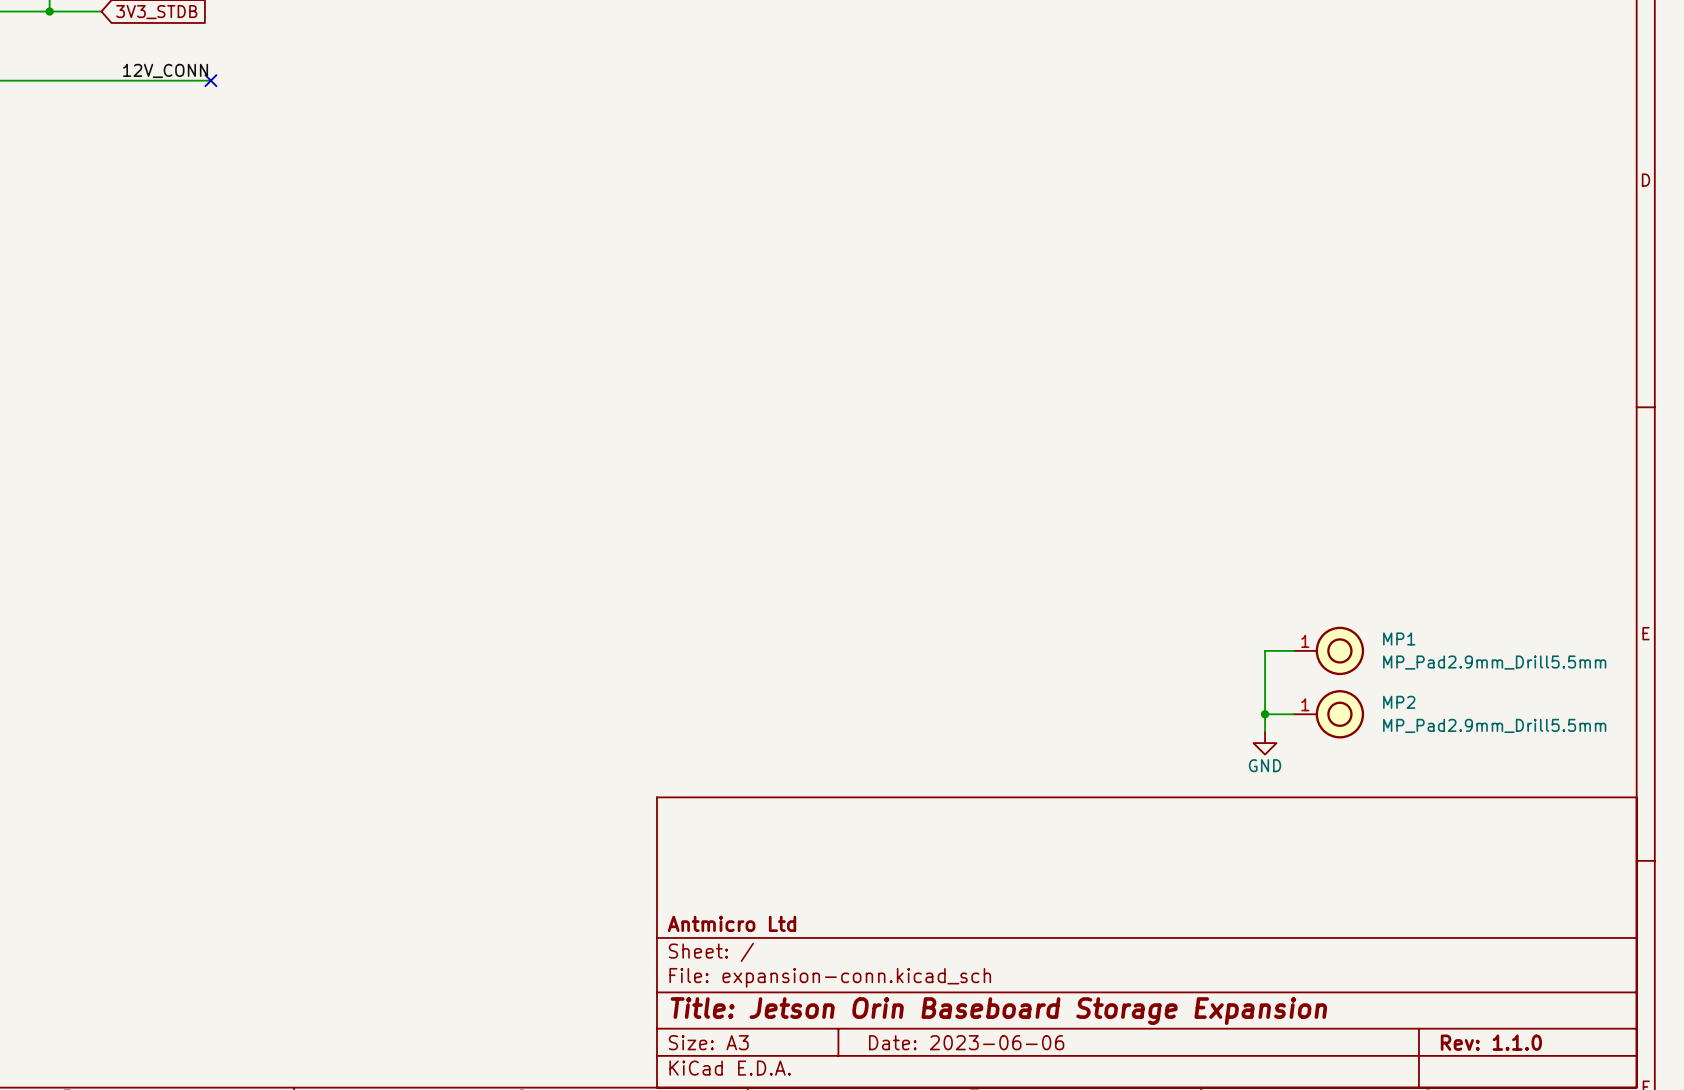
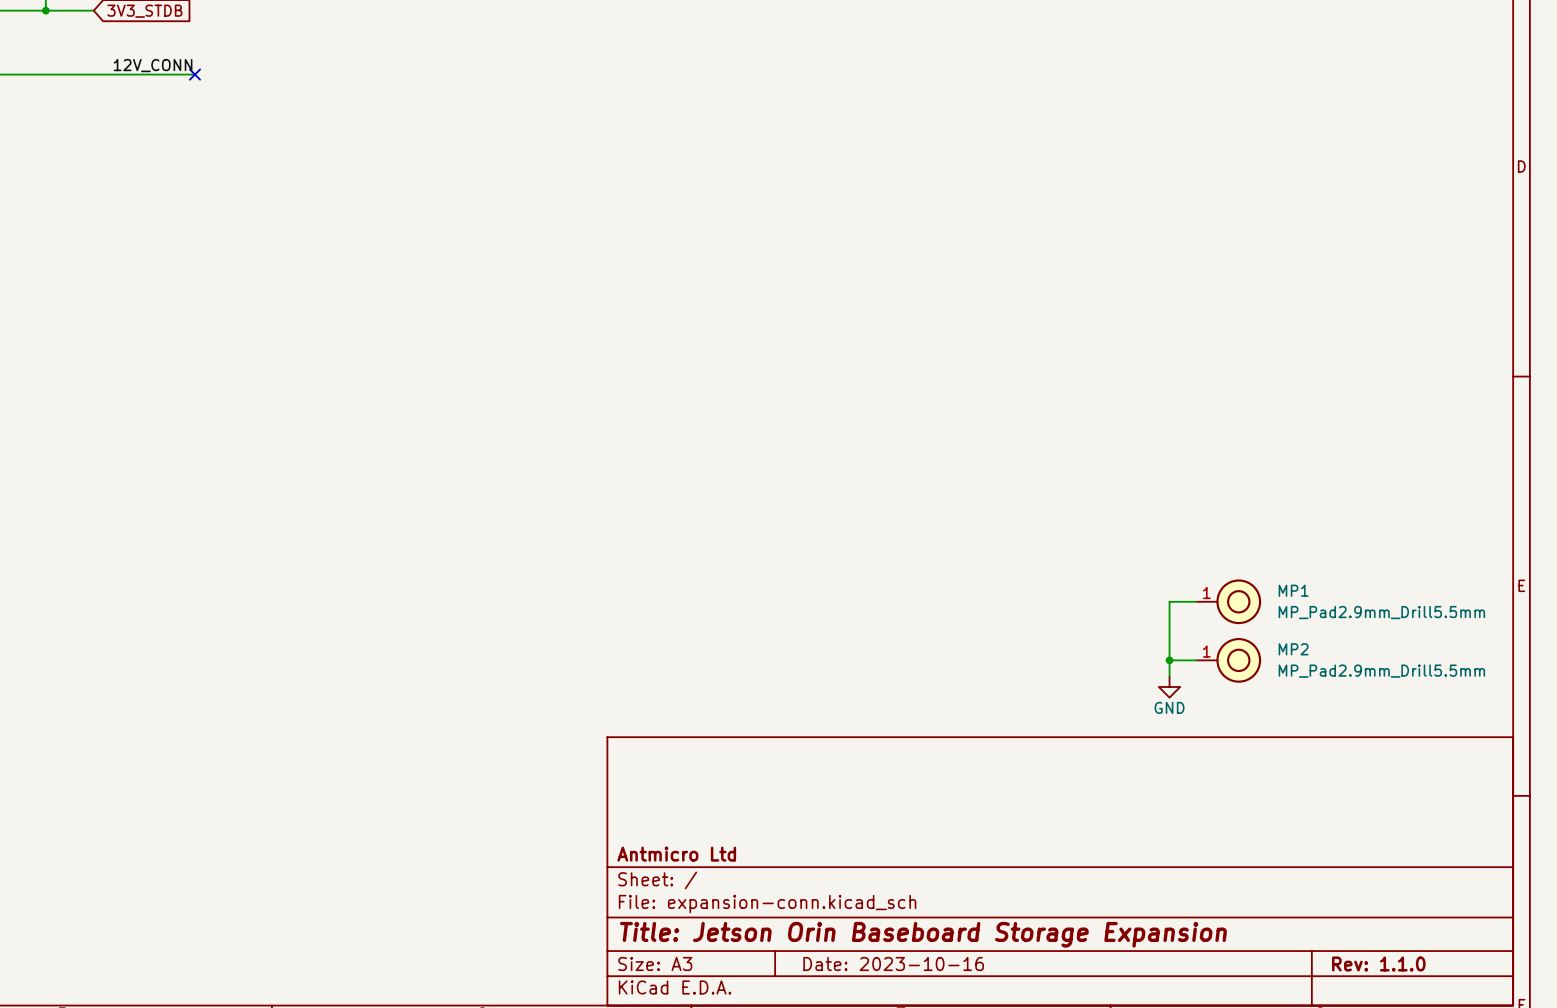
title block: Date: 2023-06-06 (966, 1042) -> Date: 2023-10-16 (893, 963)

